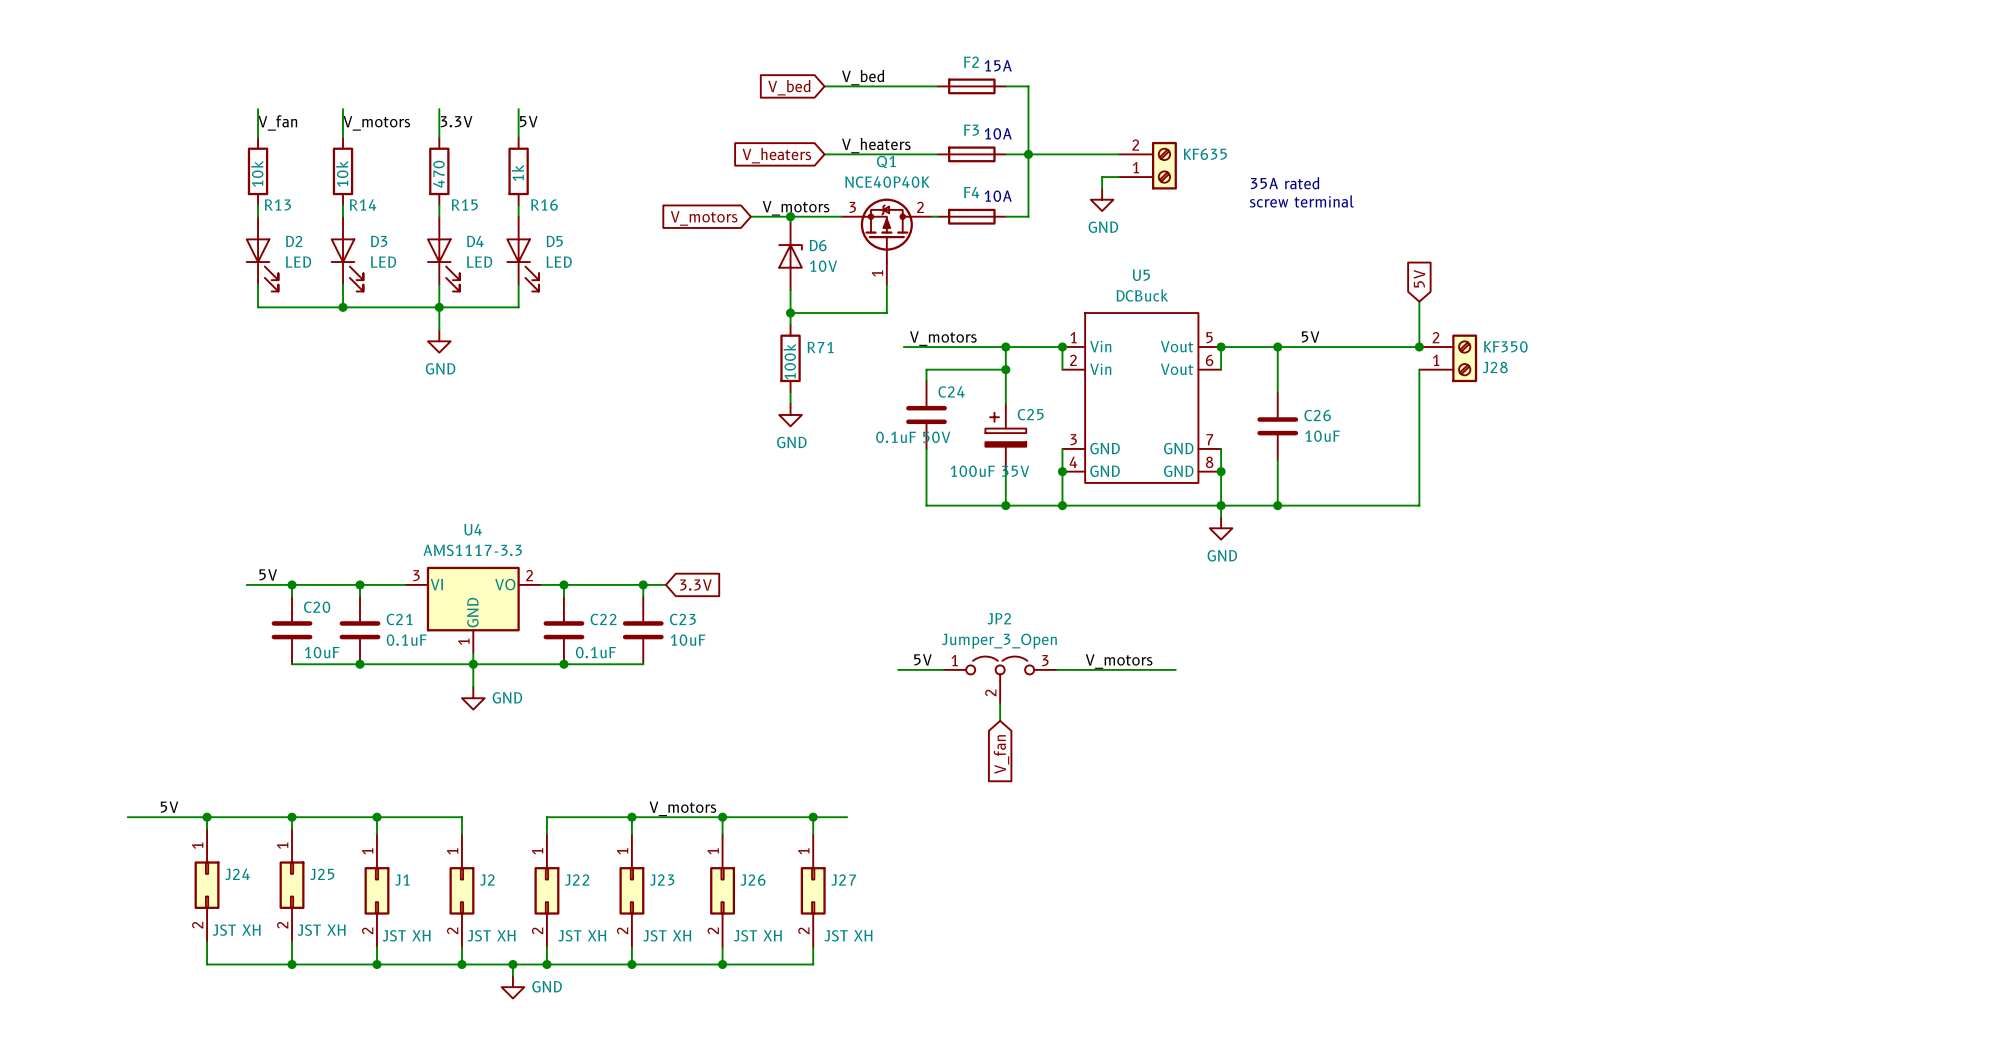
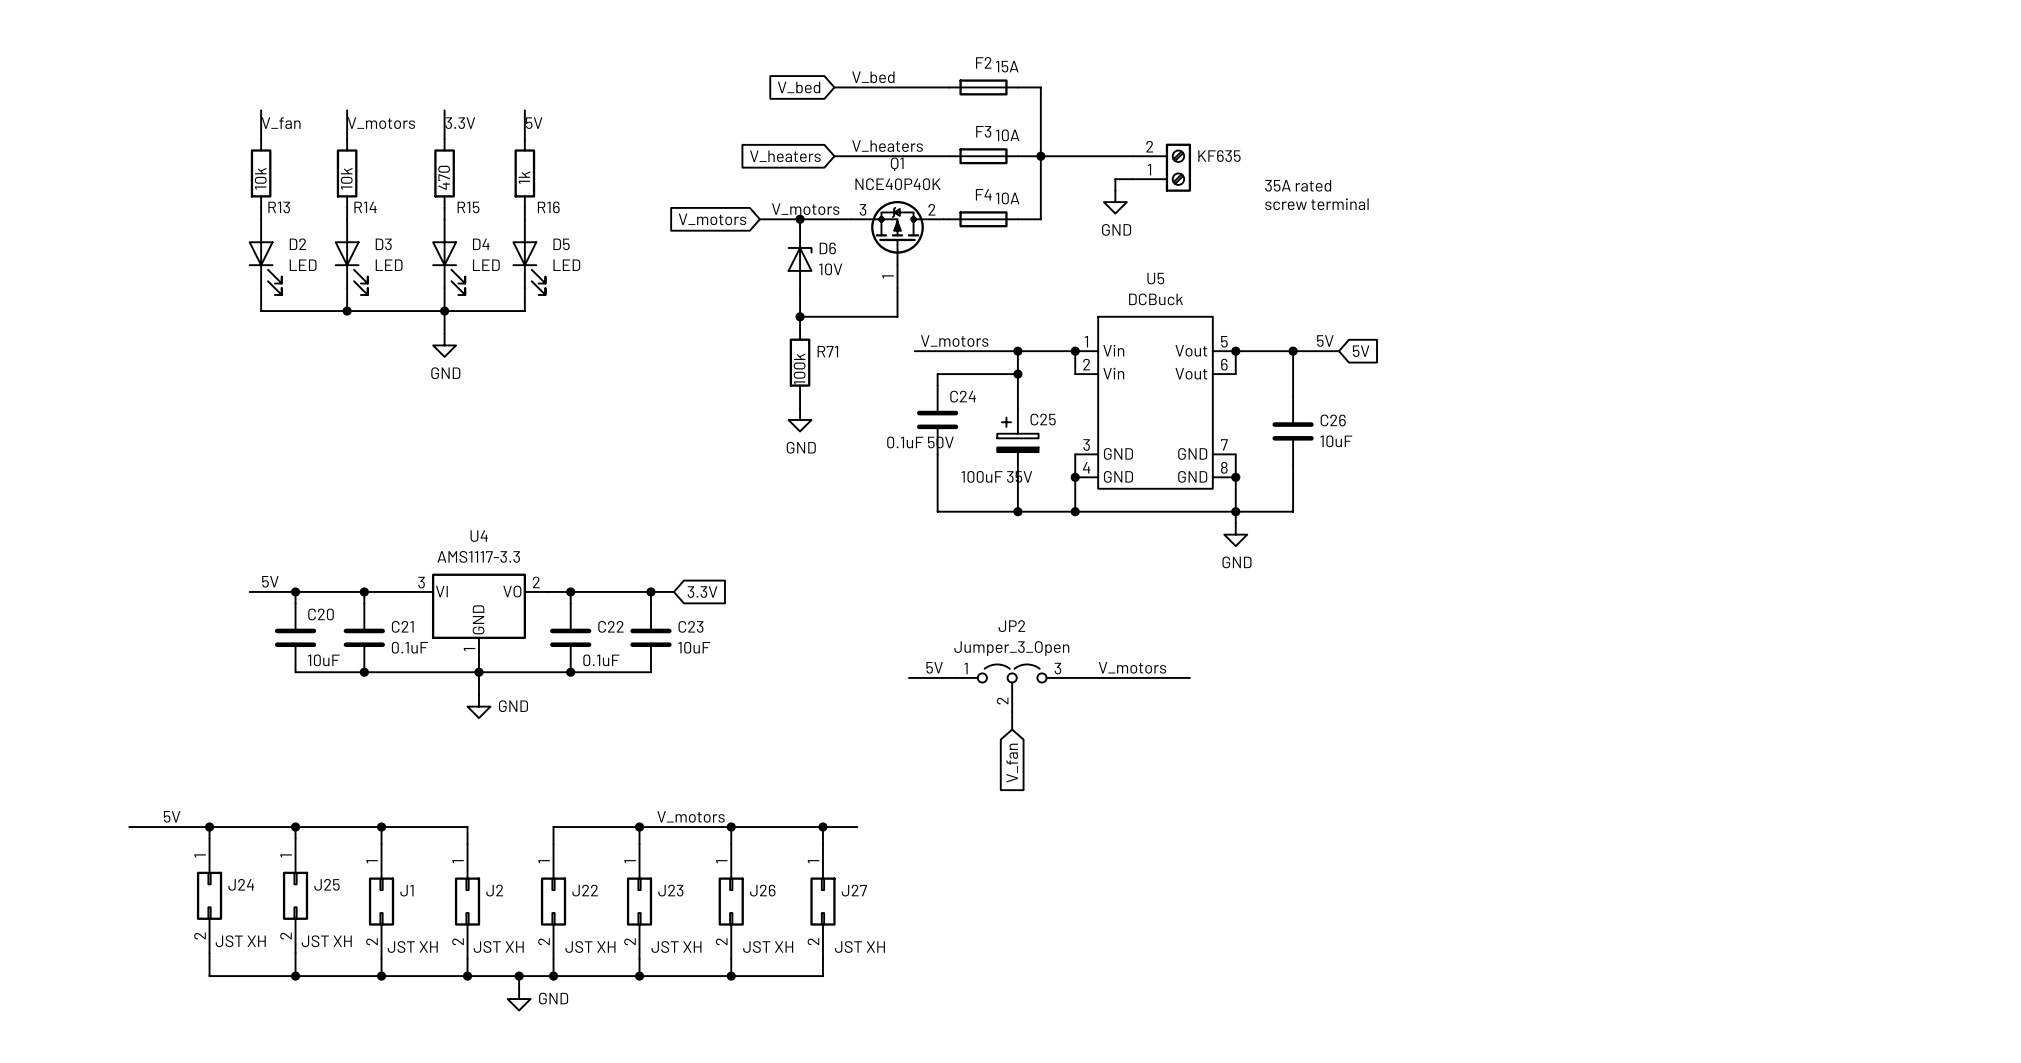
global label rotation: 0° (1419, 278) -> 90° clockwise (1361, 351)
global label position: 5V (1419, 278) -> 5V (1361, 351)
wire: (1419, 301) (1419, 347) (1323, 347) -> none
junction: (1419, 347) -> none
J28: KF350 (1448, 358) -> none
wire: (1419, 369) (1419, 505) (1277, 505) -> none
junction: (1277, 505) -> none

